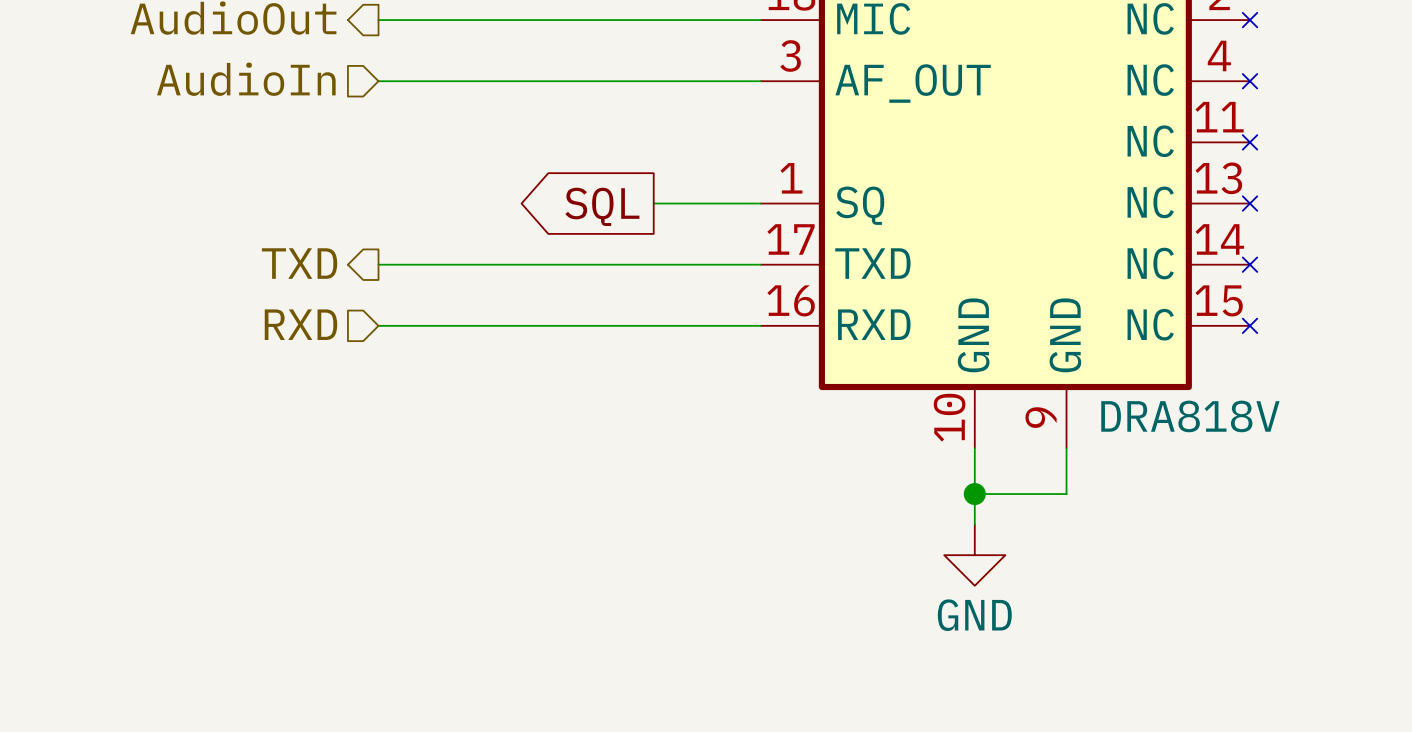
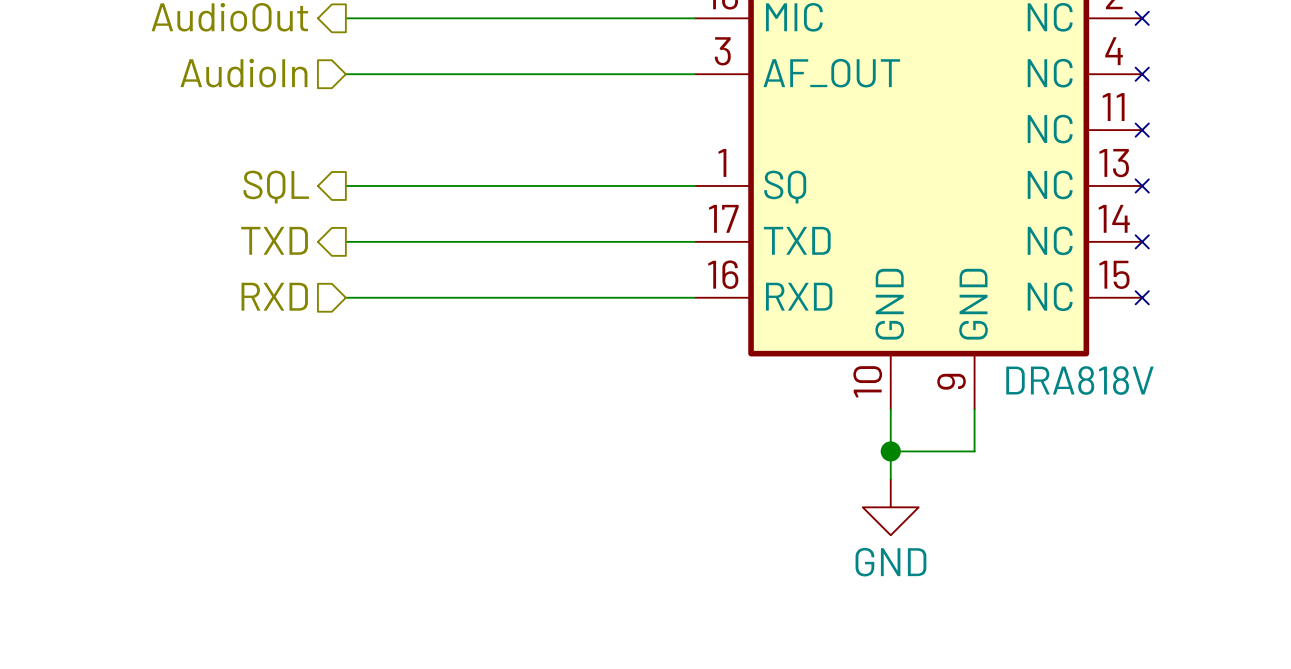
wire: none -> (345, 185) (597, 185)
hierarchical label: none -> SQL (276, 187)
global label: SQL (602, 206) -> none

